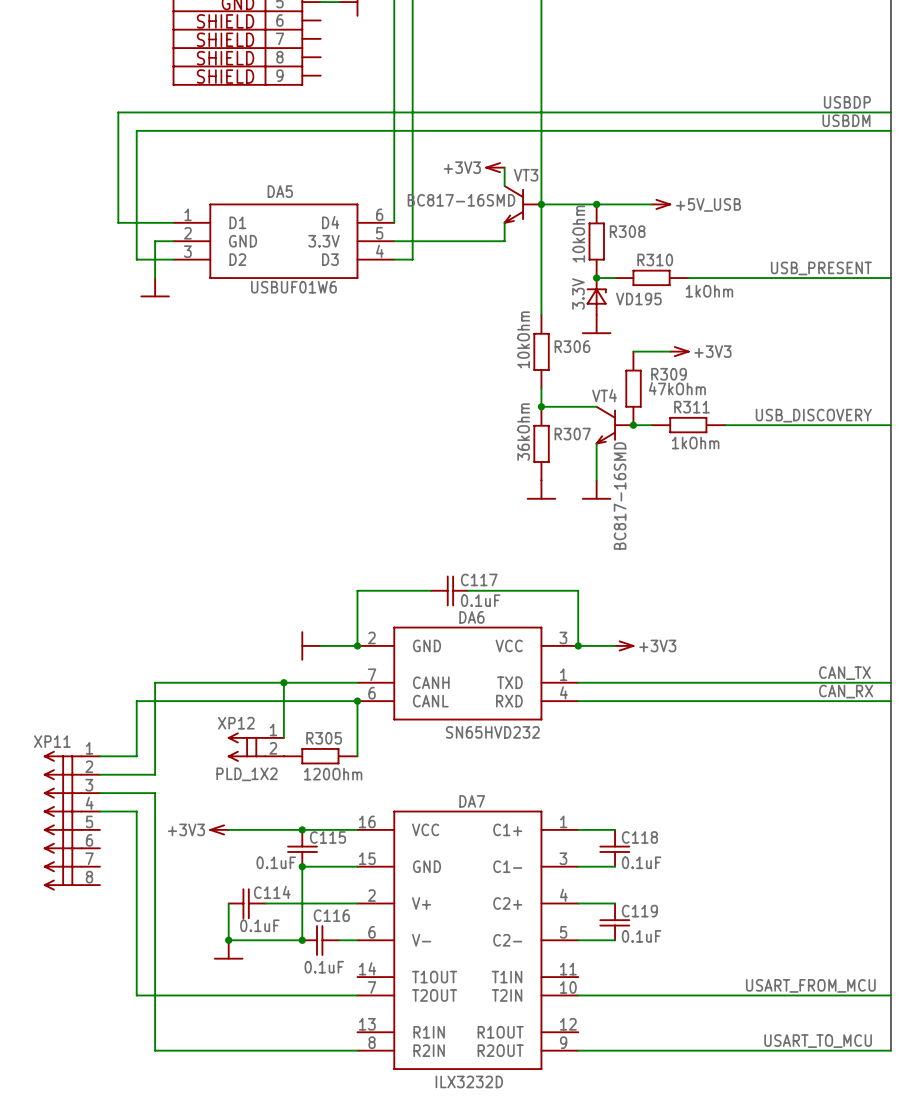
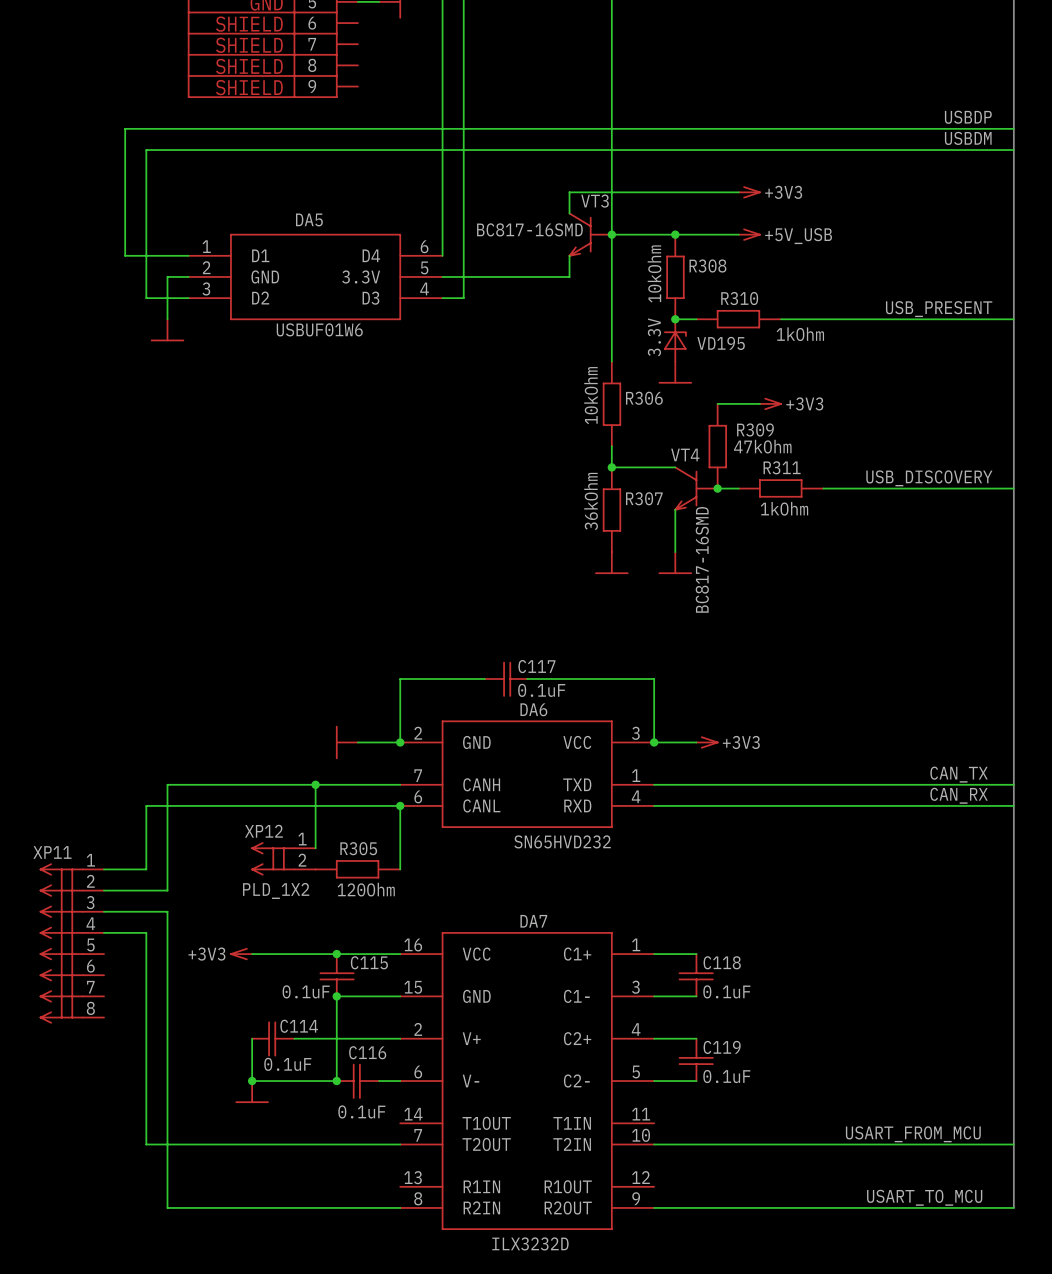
power symbol rotation: 0° (493, 167) -> 180° (752, 192)
power symbol position: +3V3 (495, 167) -> +3V3 (749, 192)
wire: none -> (569, 192) (738, 192)

